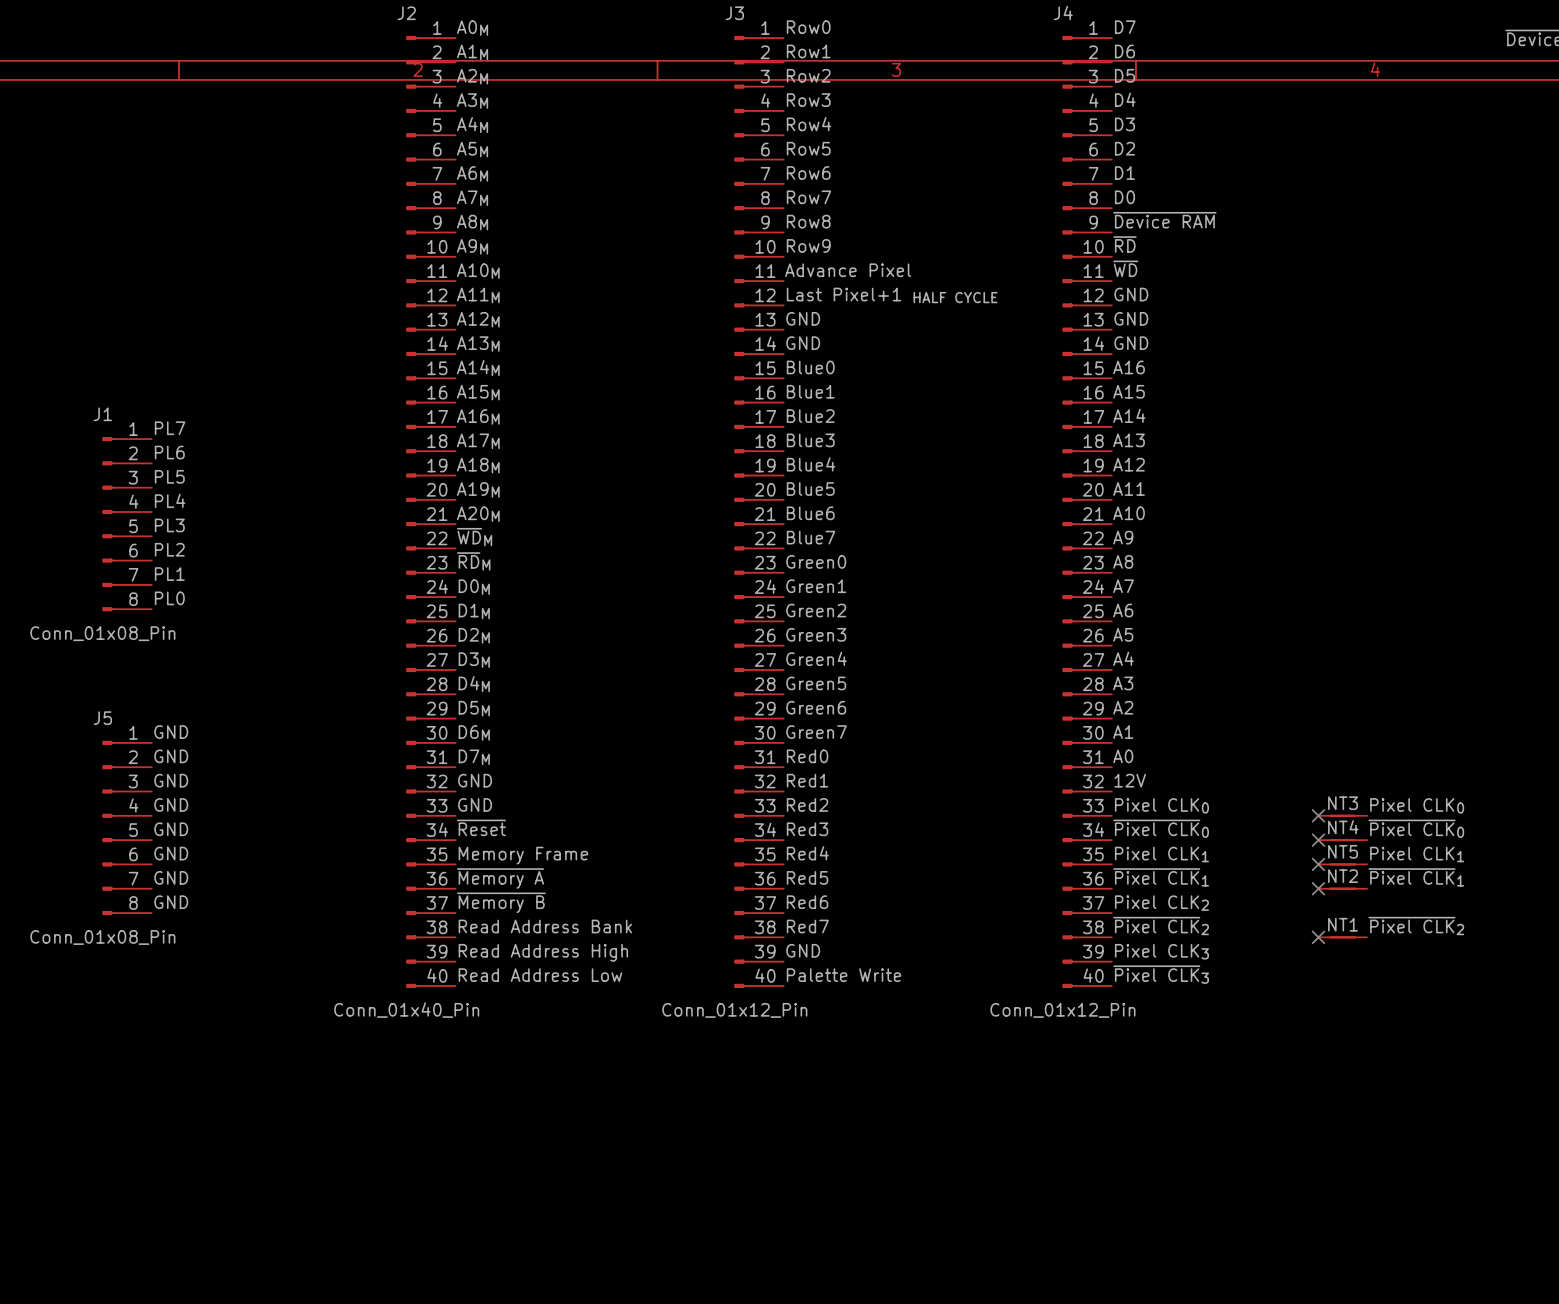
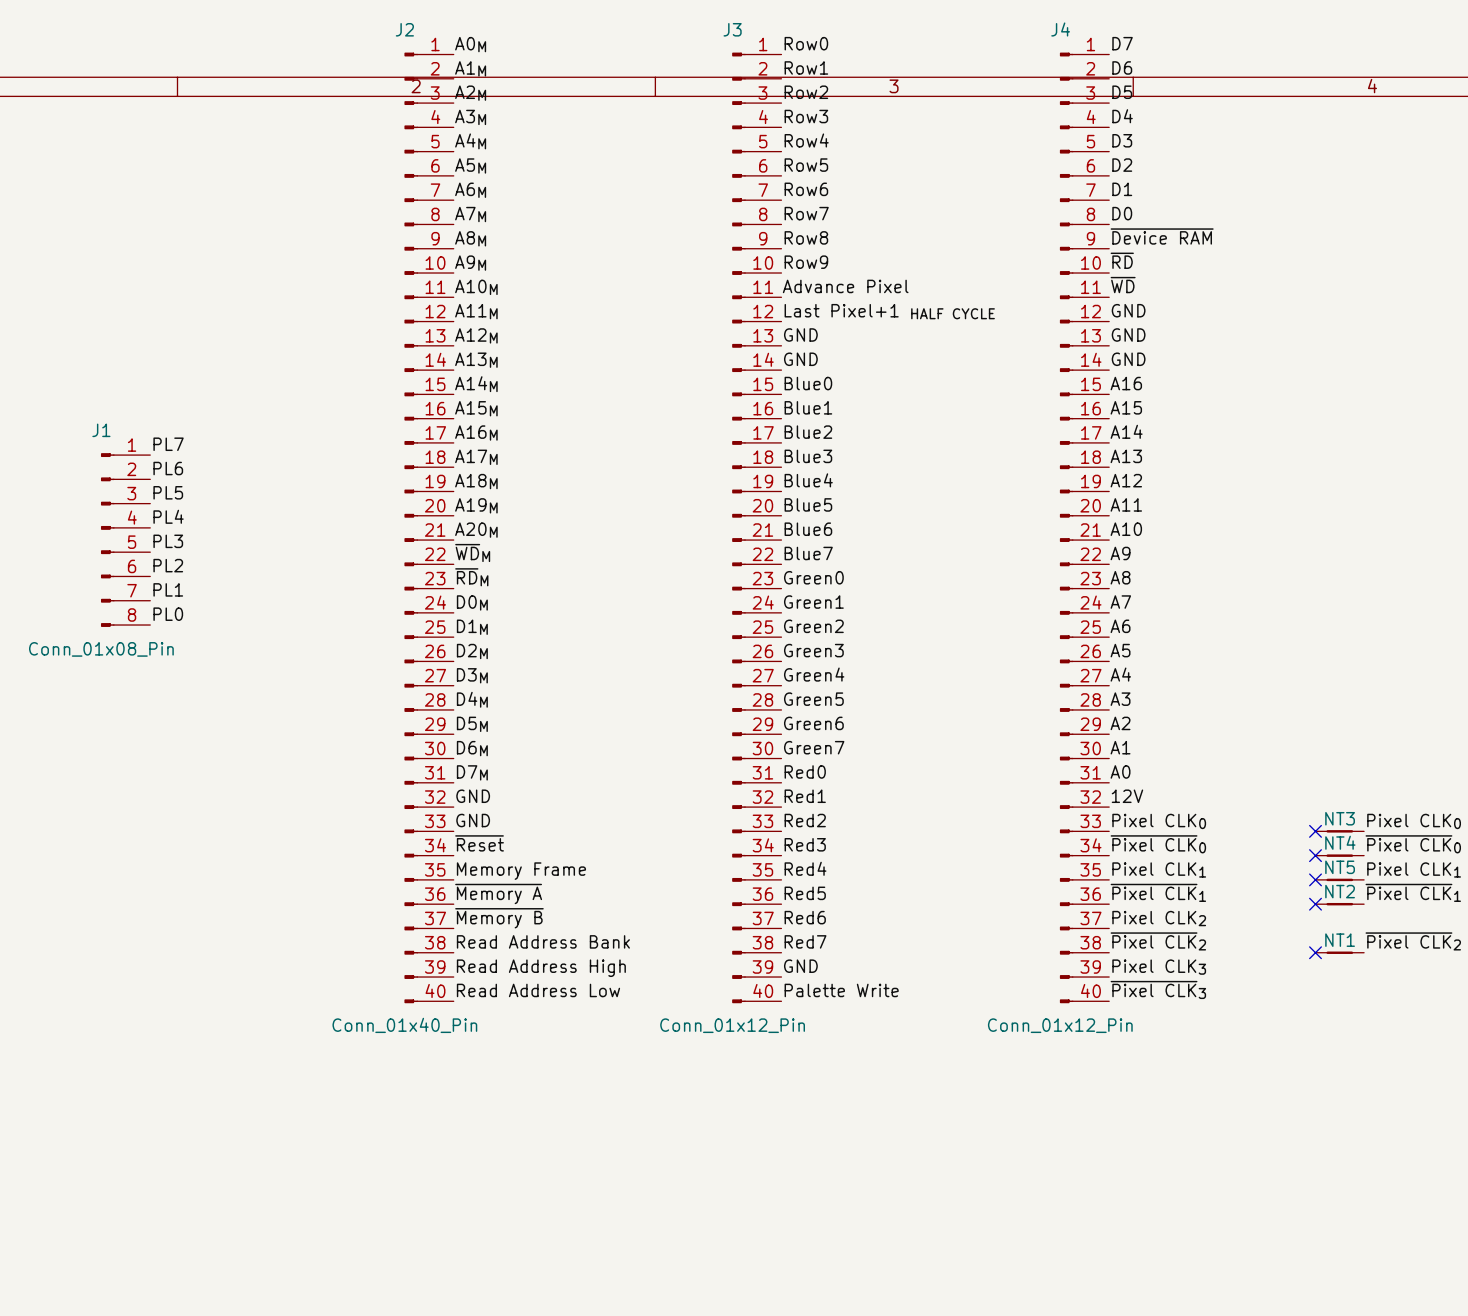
label: GND (171, 732) -> none
label: GND (171, 756) -> none
label: GND (171, 780) -> none
label: GND (171, 804) -> none
J5: Conn_01x08_Pin (127, 827) -> none
label: GND (171, 829) -> none
label: GND (171, 853) -> none
label: GND (171, 877) -> none
label: GND (171, 902) -> none

